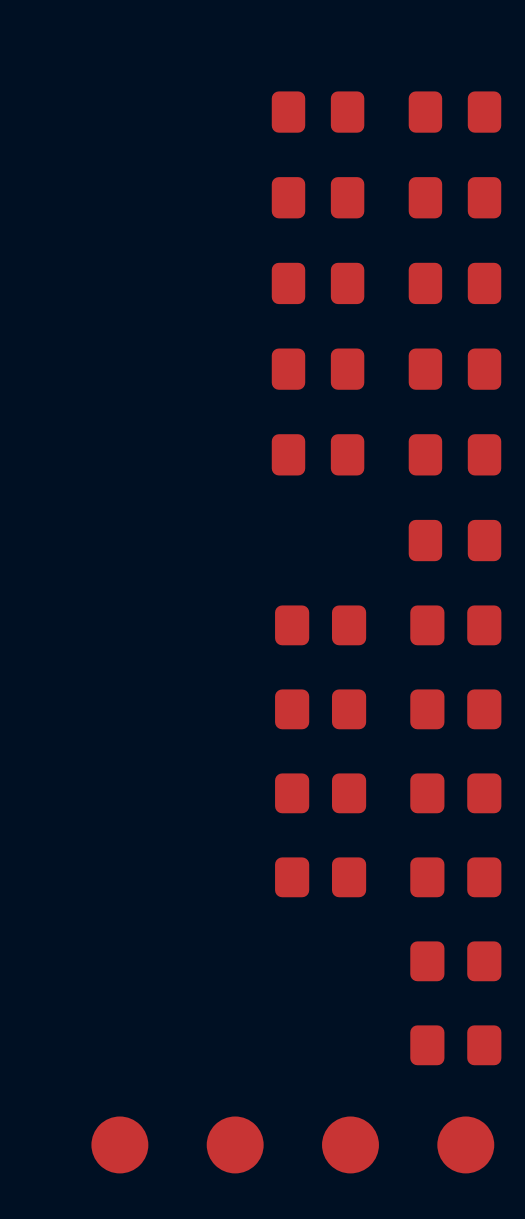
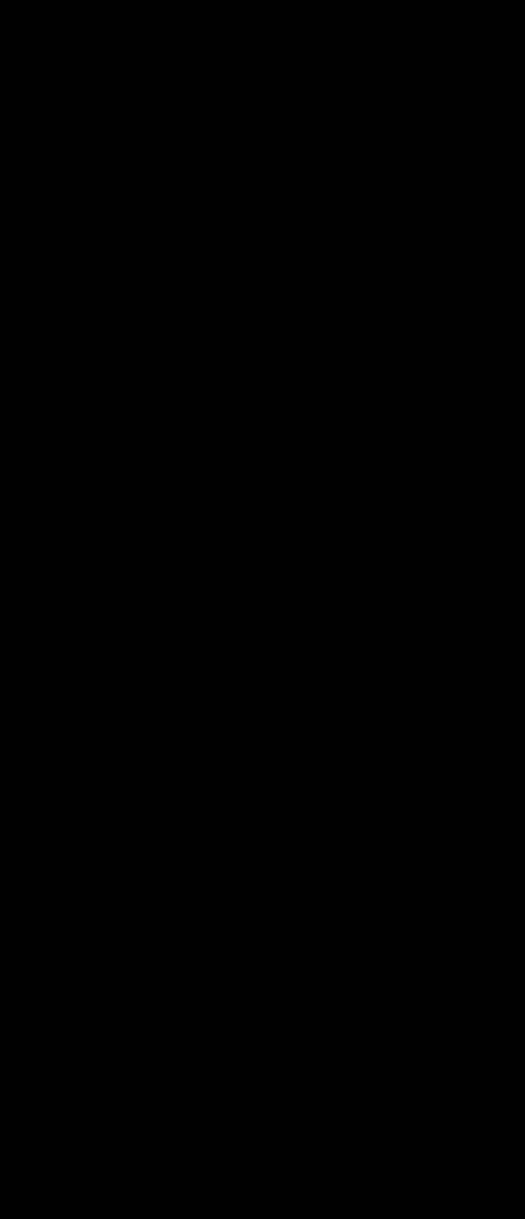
part: (318, 112) -> none
part: (454, 112) -> none
part: (318, 197) -> none
part: (454, 197) -> none
part: (318, 283) -> none
part: (454, 283) -> none
part: (318, 369) -> none
part: (454, 369) -> none
part: (318, 454) -> none
part: (454, 454) -> none
part: (454, 540) -> none
part: (320, 625) -> none
part: (455, 625) -> none
part: (320, 709) -> none
part: (455, 709) -> none
part: (320, 793) -> none
part: (455, 793) -> none
part: (320, 877) -> none
part: (455, 877) -> none
part: (455, 961) -> none
part: (455, 1045) -> none
part: (119, 1144) -> none
part: (235, 1144) -> none
part: (350, 1144) -> none
part: (465, 1144) -> none

